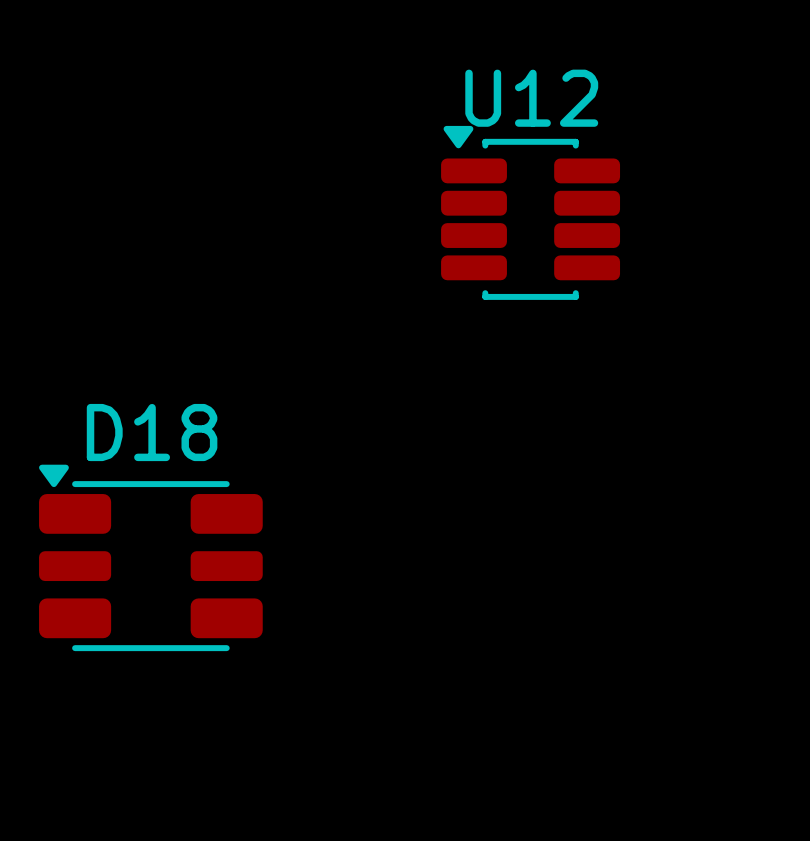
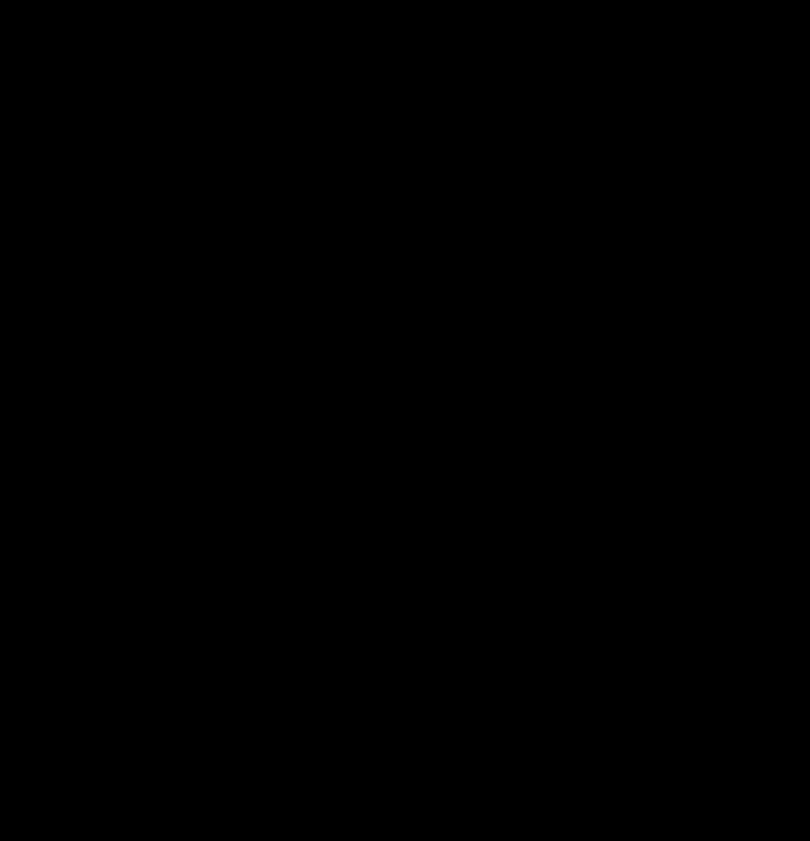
U12: (530, 212) -> none
D18: (150, 557) -> none

